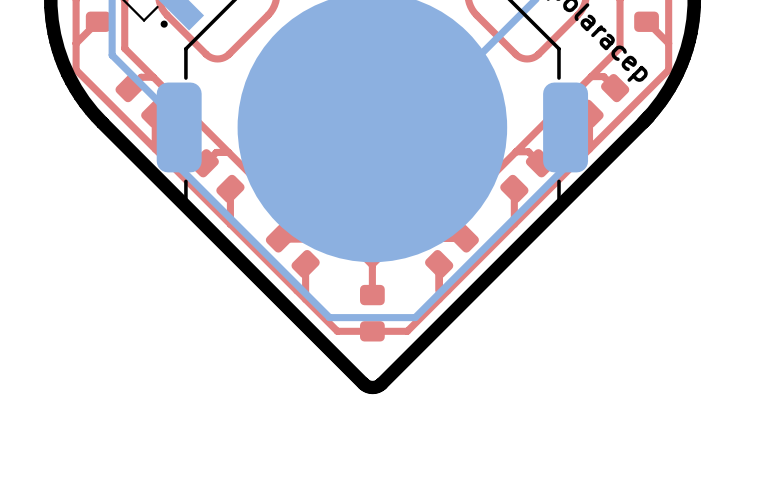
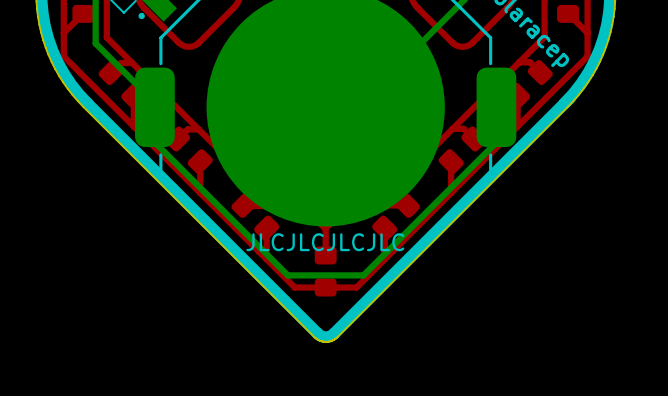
text: none -> JLCJLCJLCJLC (325, 242)

